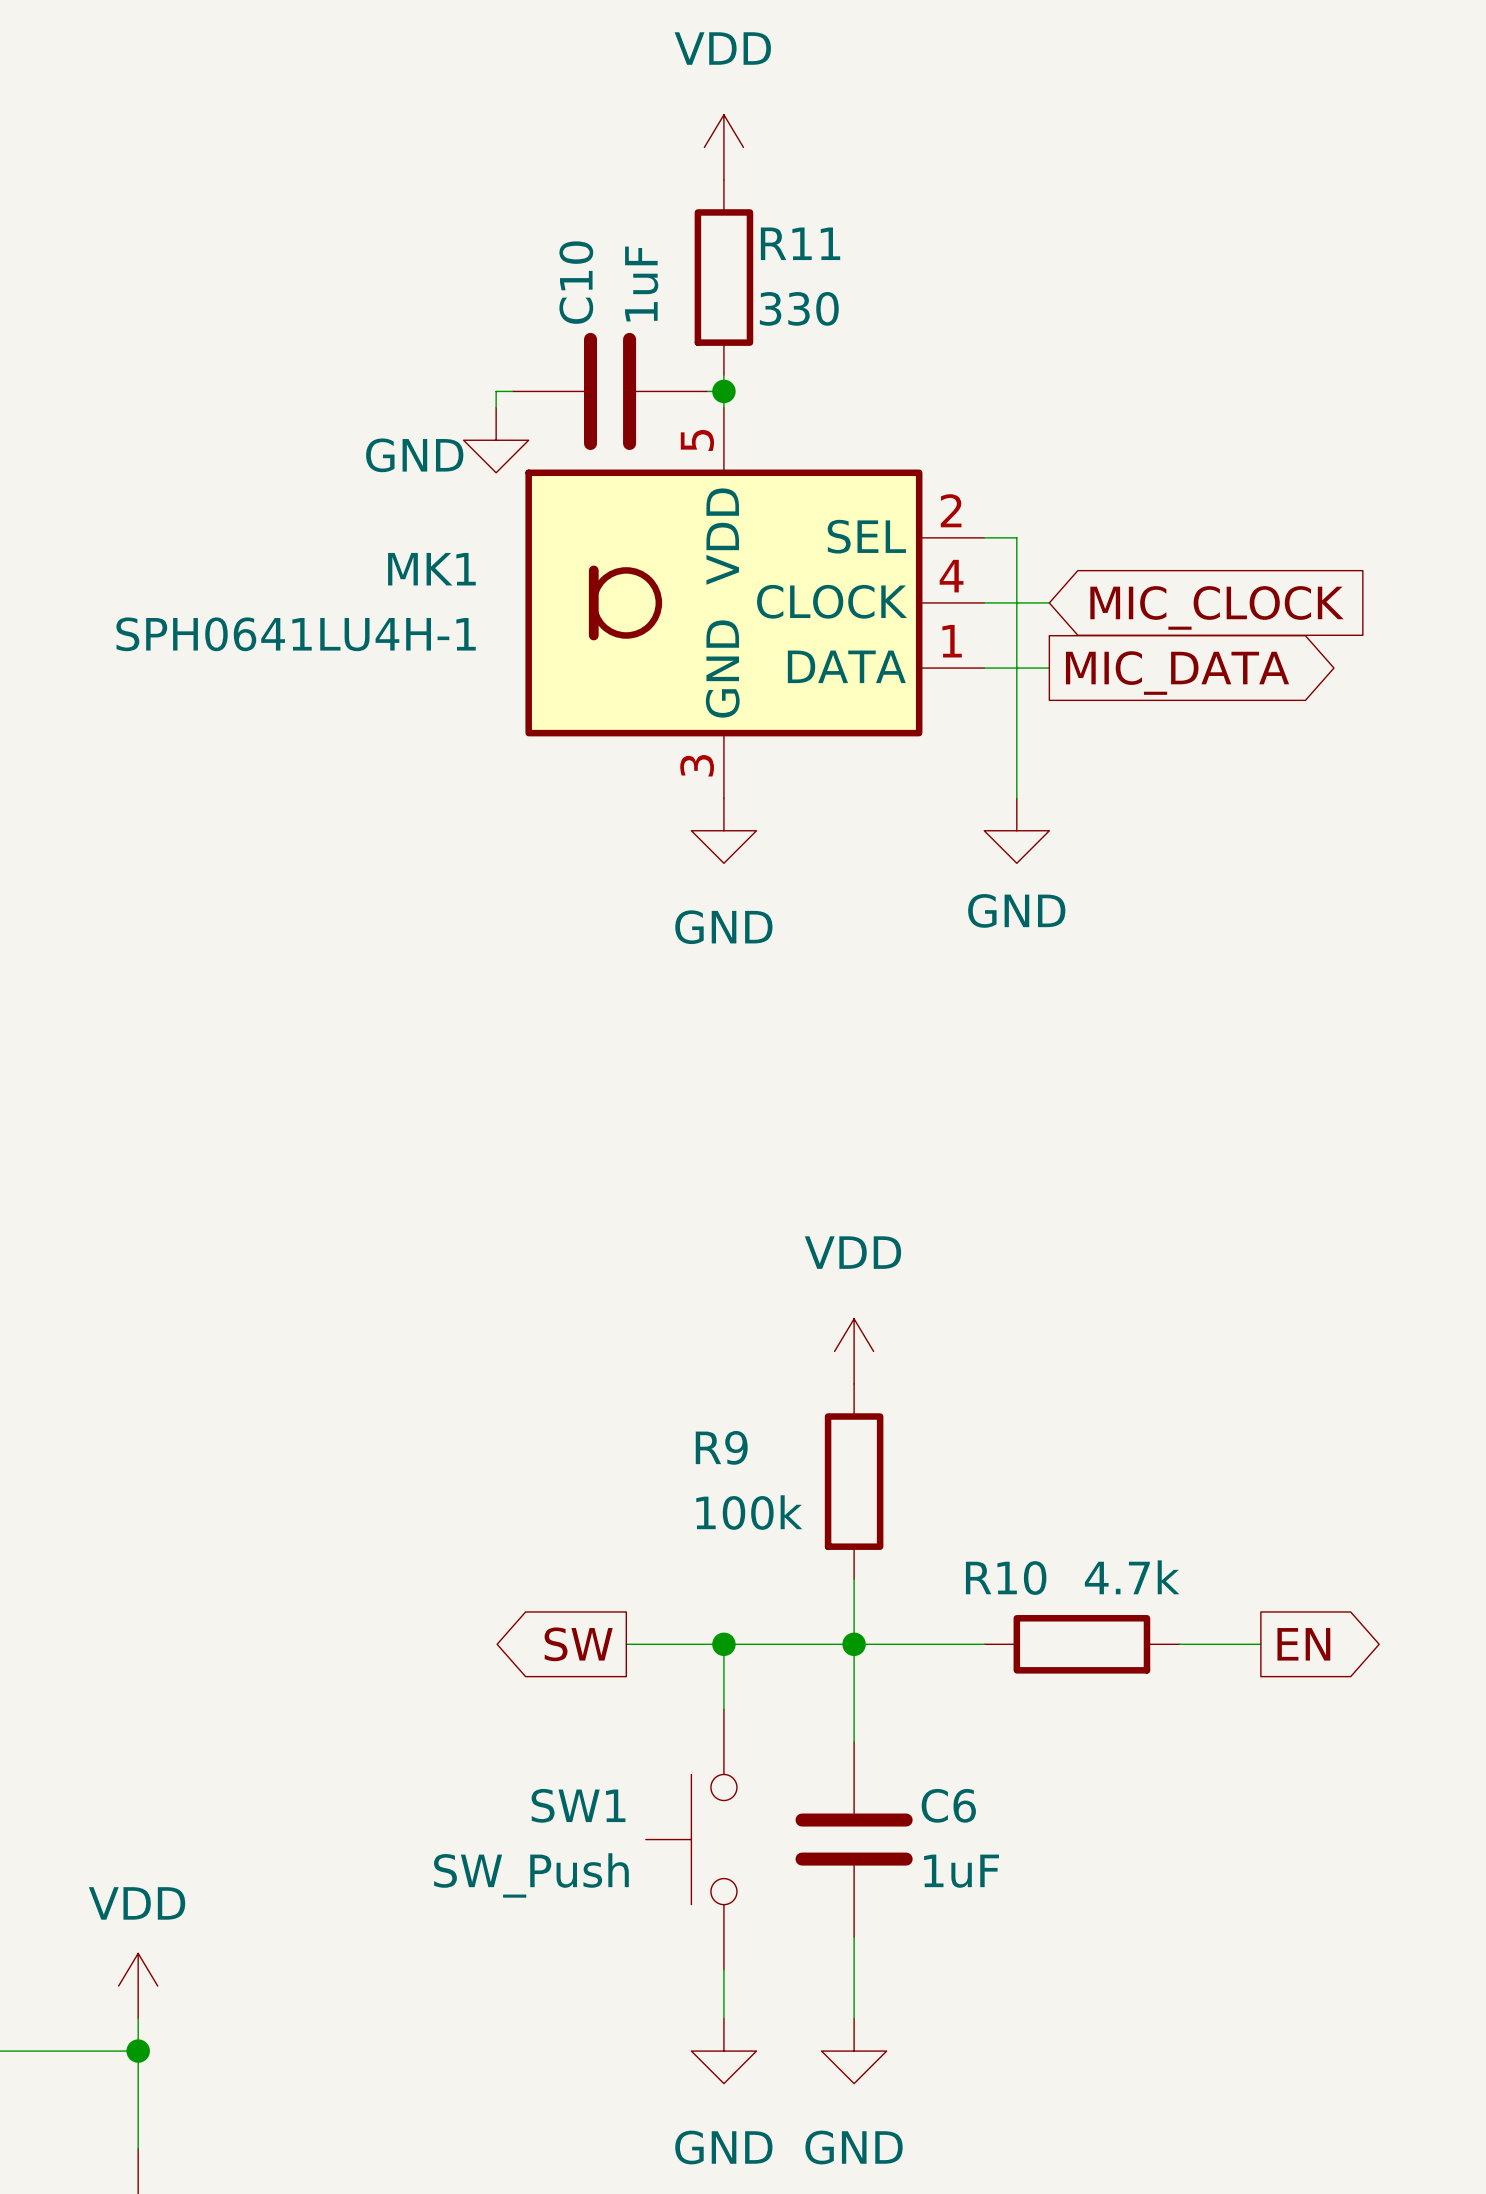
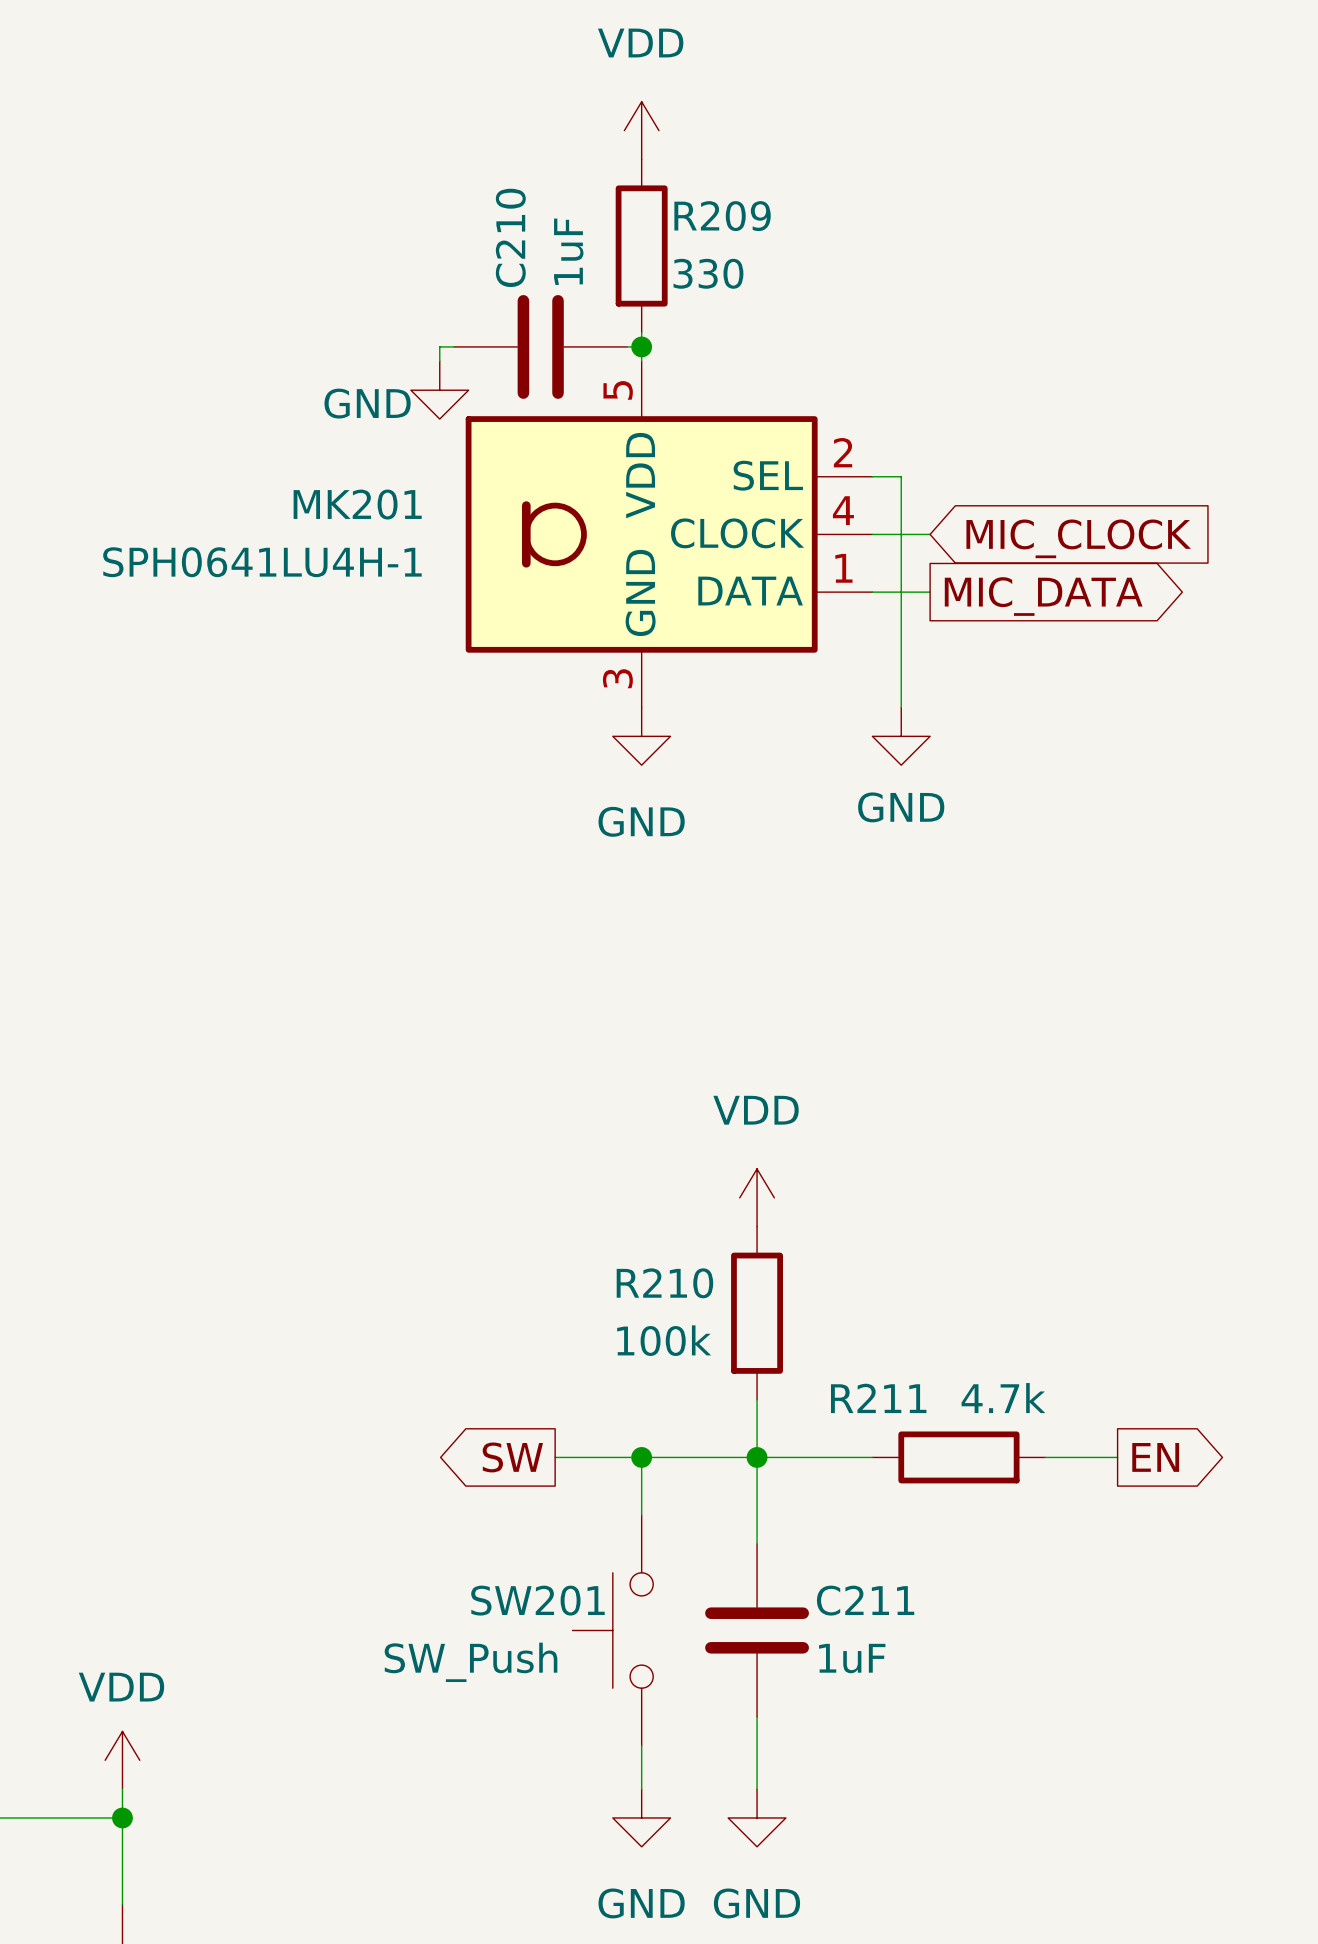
R11 name: R11 (800, 243) -> R209 (722, 216)
C10 name: C10 (576, 282) -> C210 (510, 237)
MK1 name: MK1 (431, 569) -> MK201 (357, 504)
R9 name: R9 (721, 1447) -> R210 (664, 1283)
R10 name: R10 (1006, 1578) -> R211 (878, 1398)
SW1 name: SW1 (578, 1805) -> SW201 (537, 1600)
C6 name: C6 (948, 1805) -> C211 (865, 1600)

